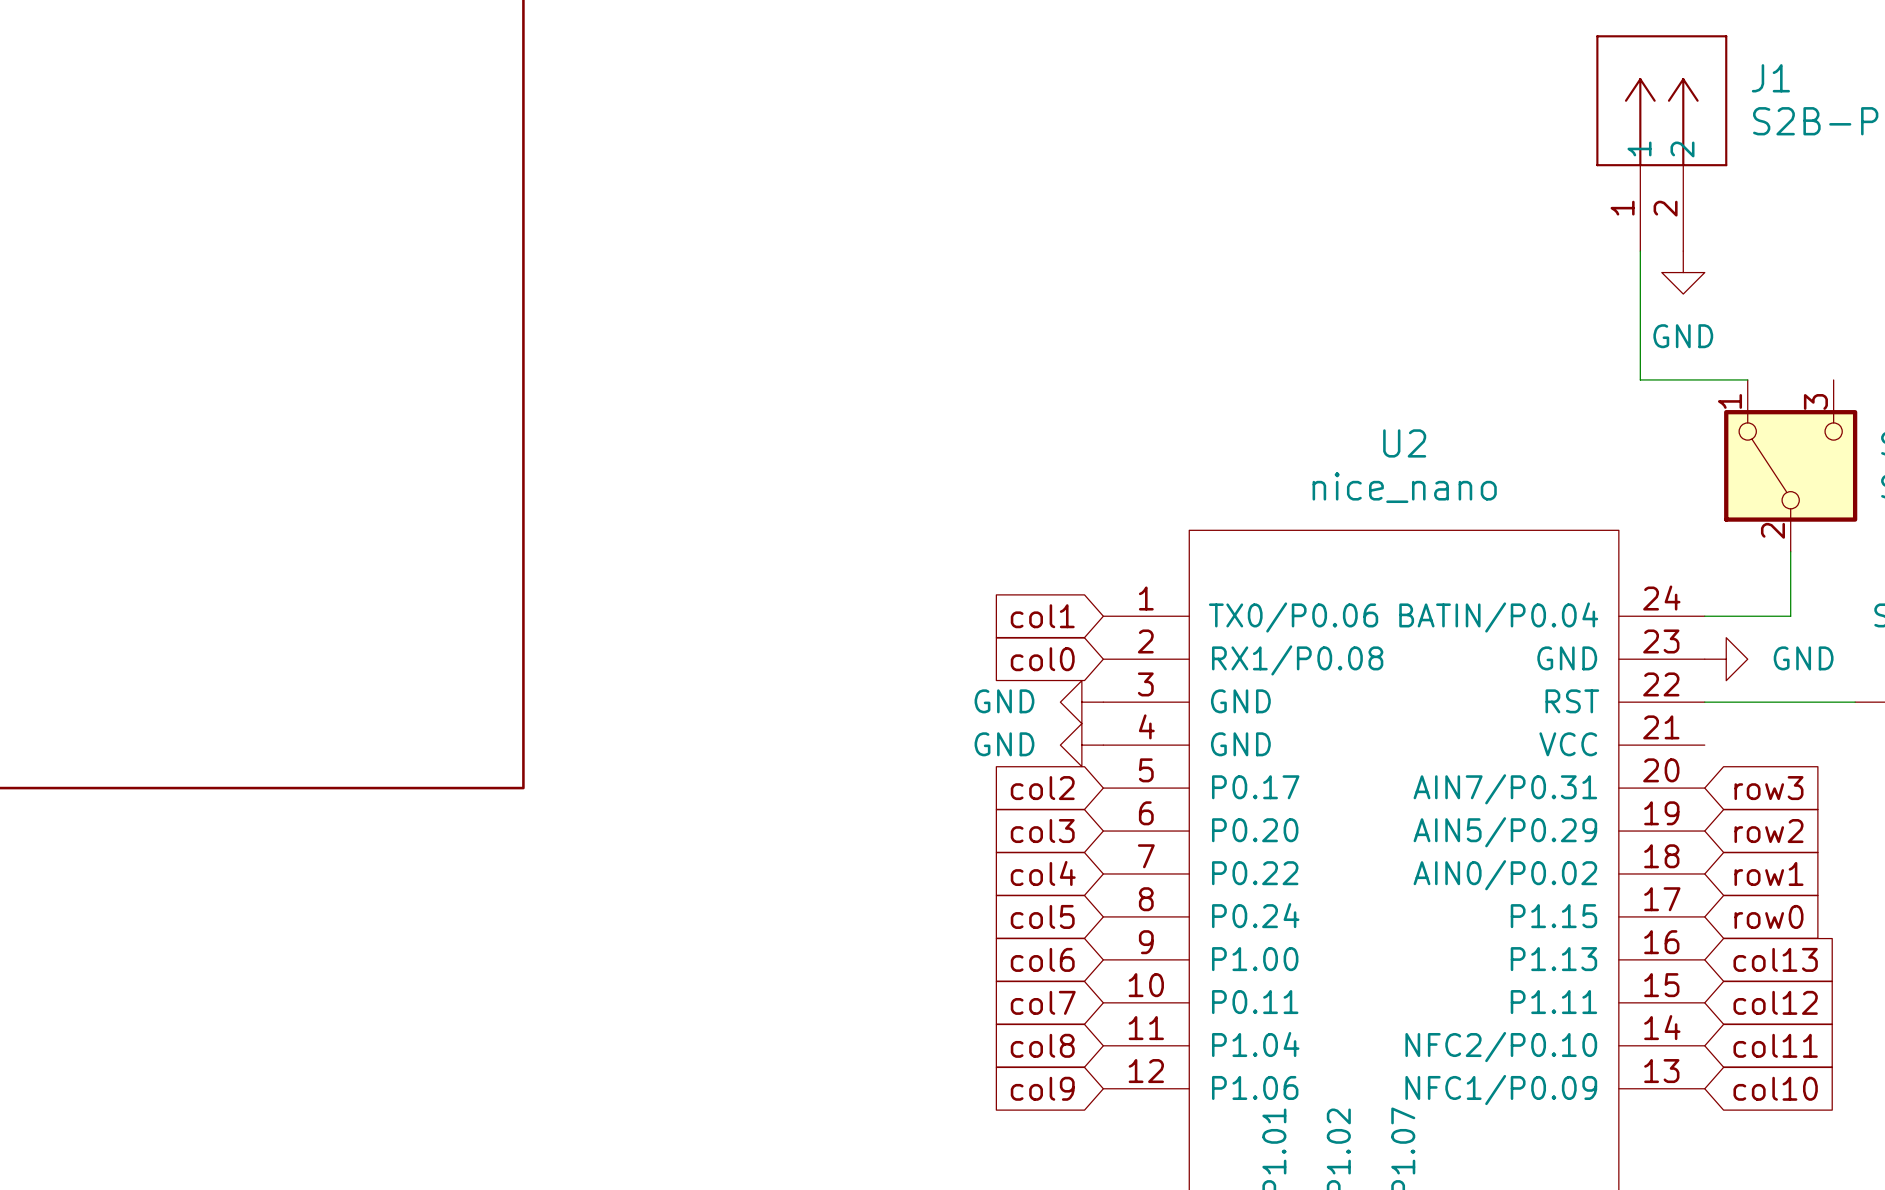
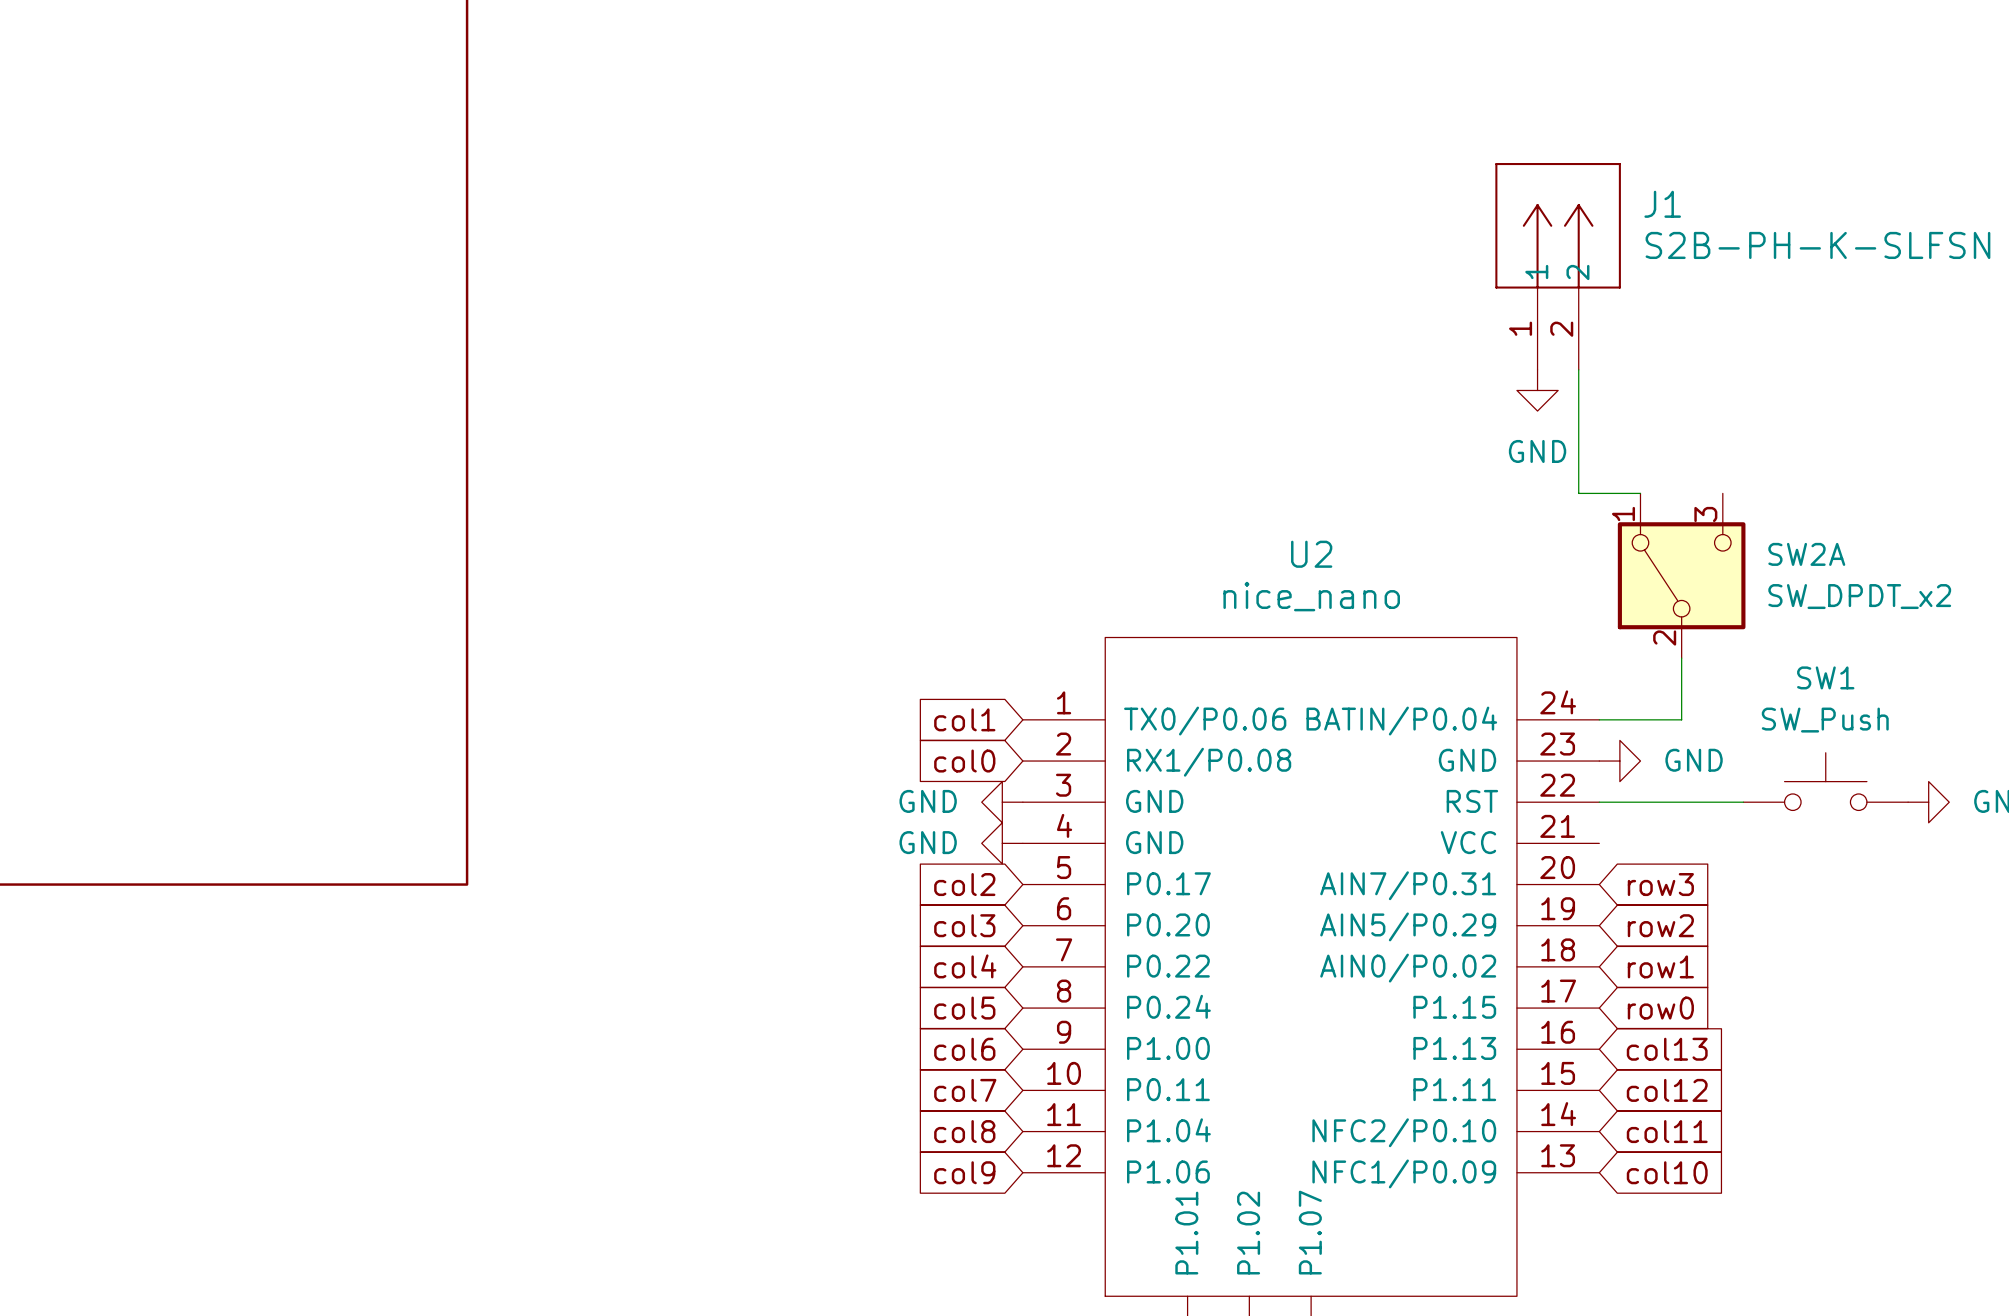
wire: (1640, 251) (1640, 379) (1683, 379) -> (1578, 369) (1578, 493)
power symbol position: GND (1683, 272) -> GND (1537, 390)

